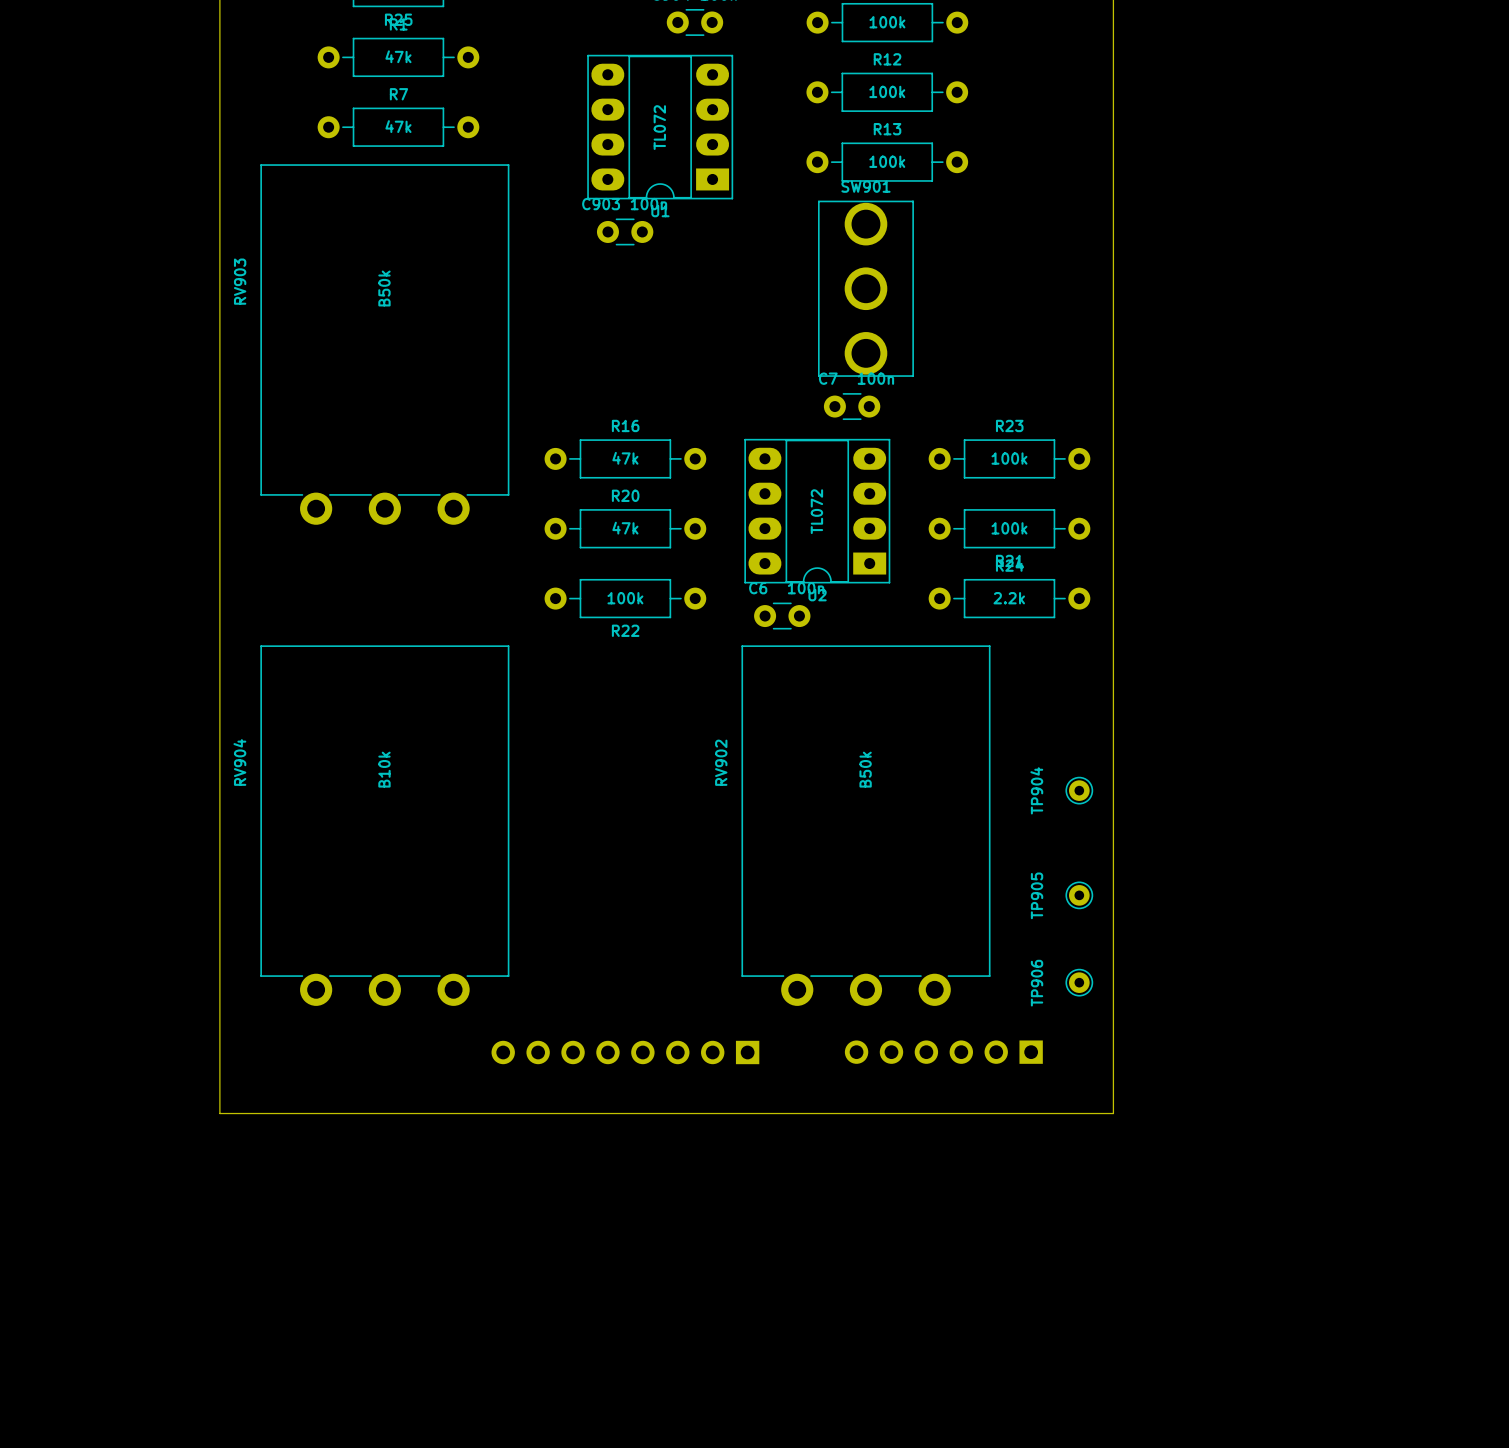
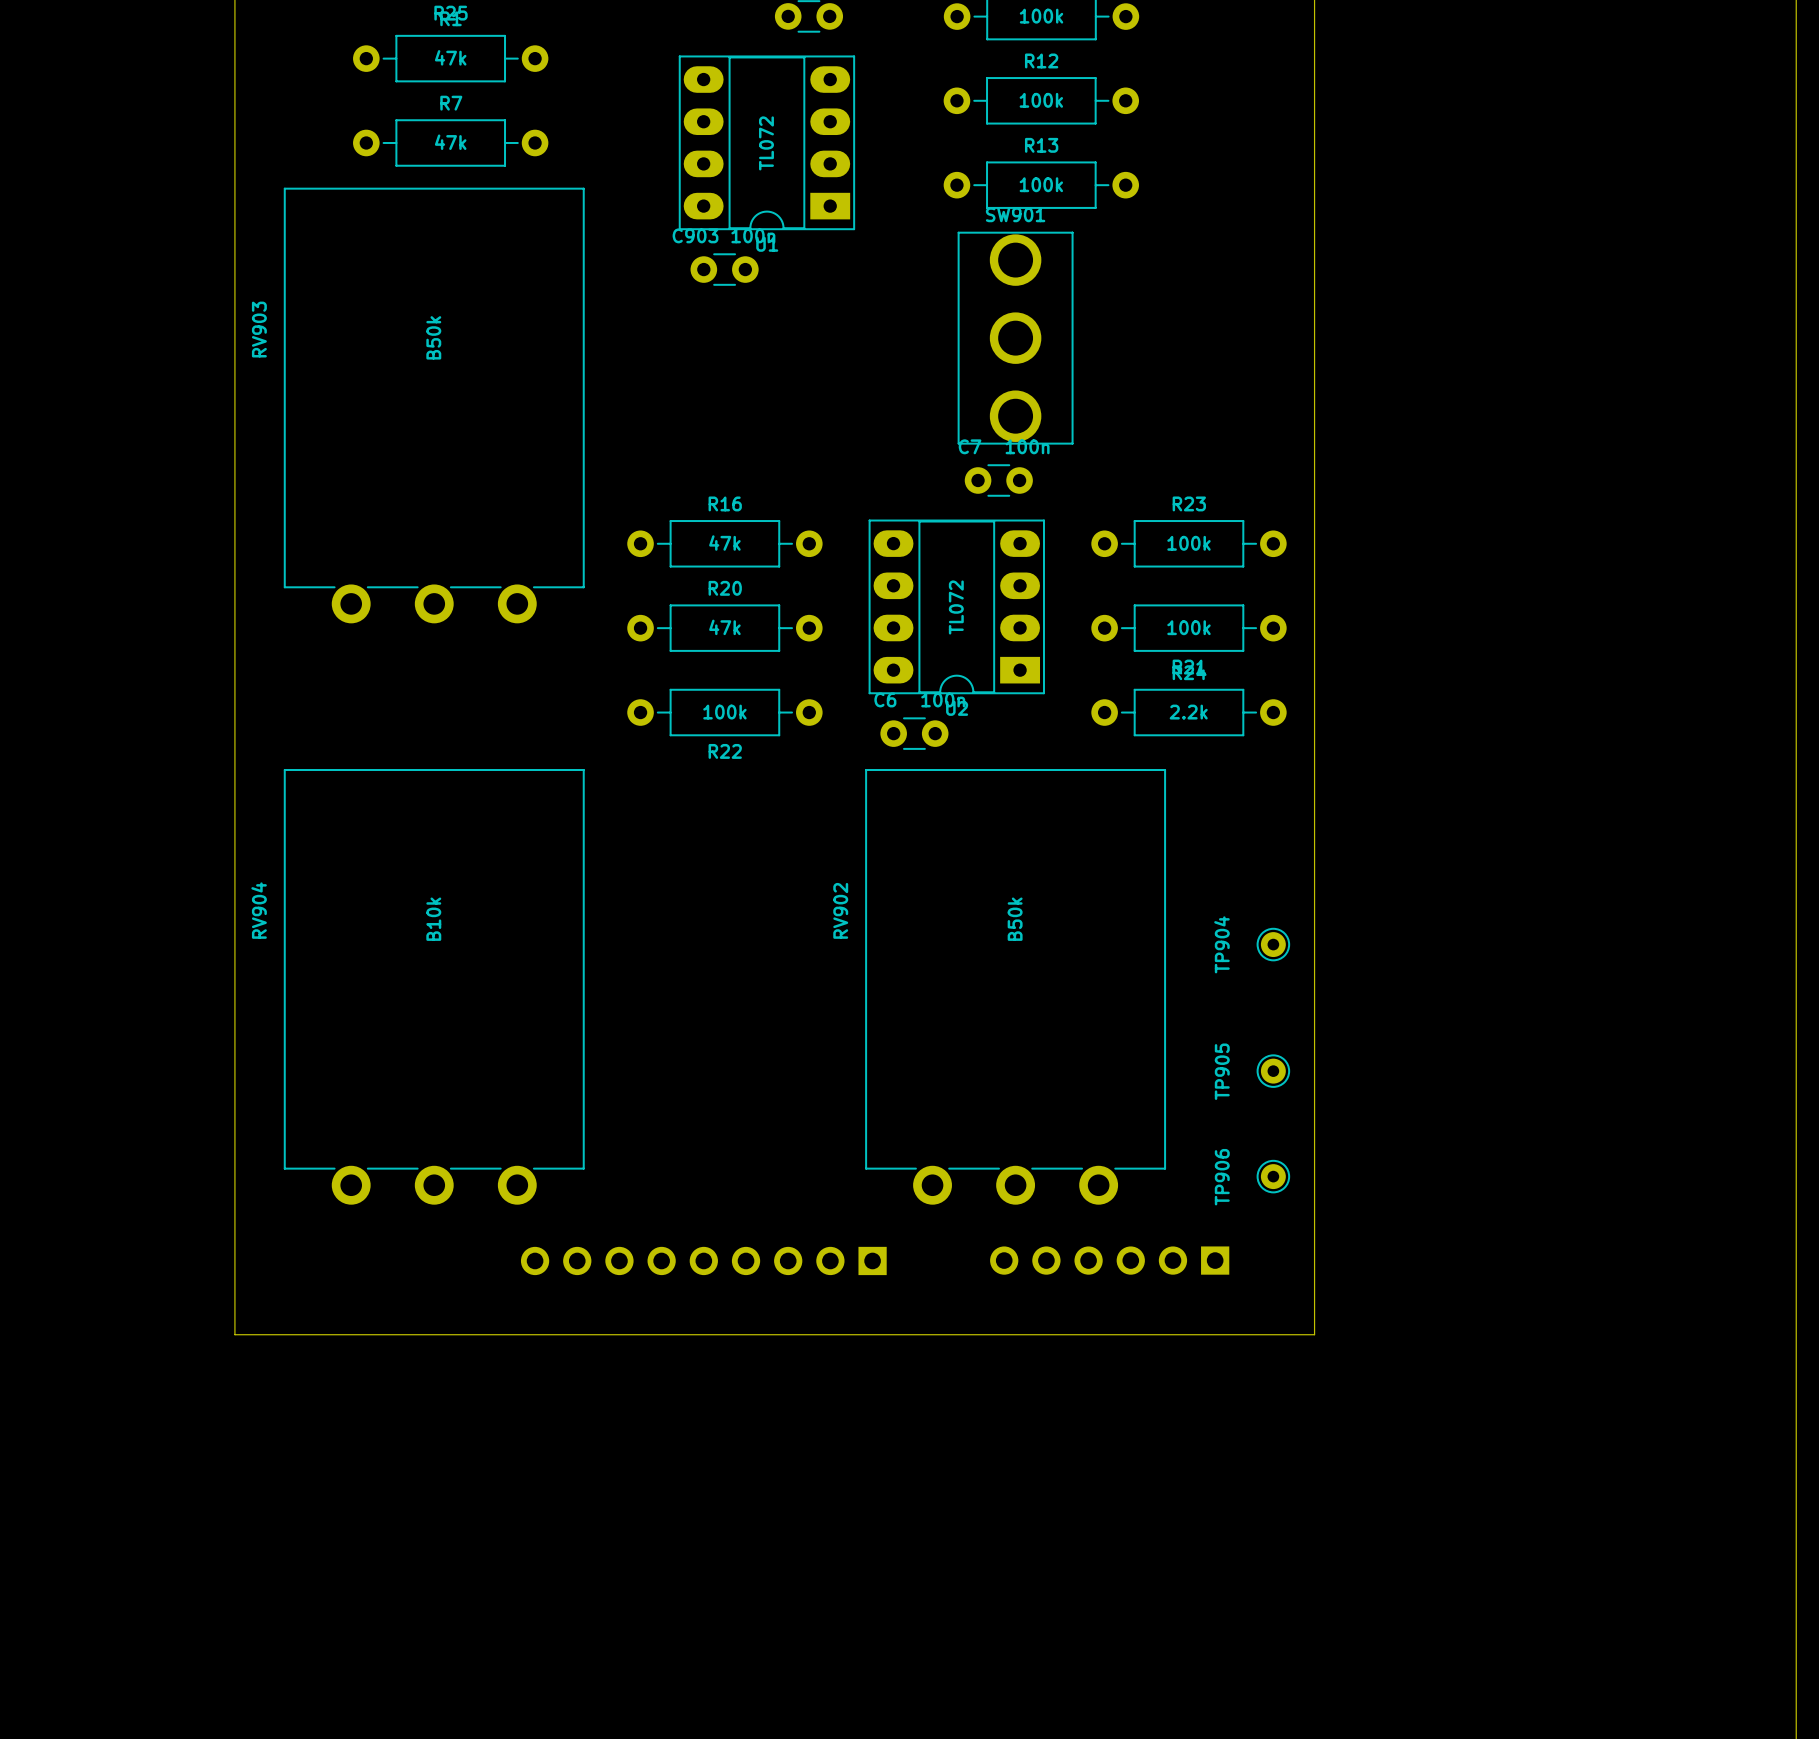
part: none -> (703, 1260)

